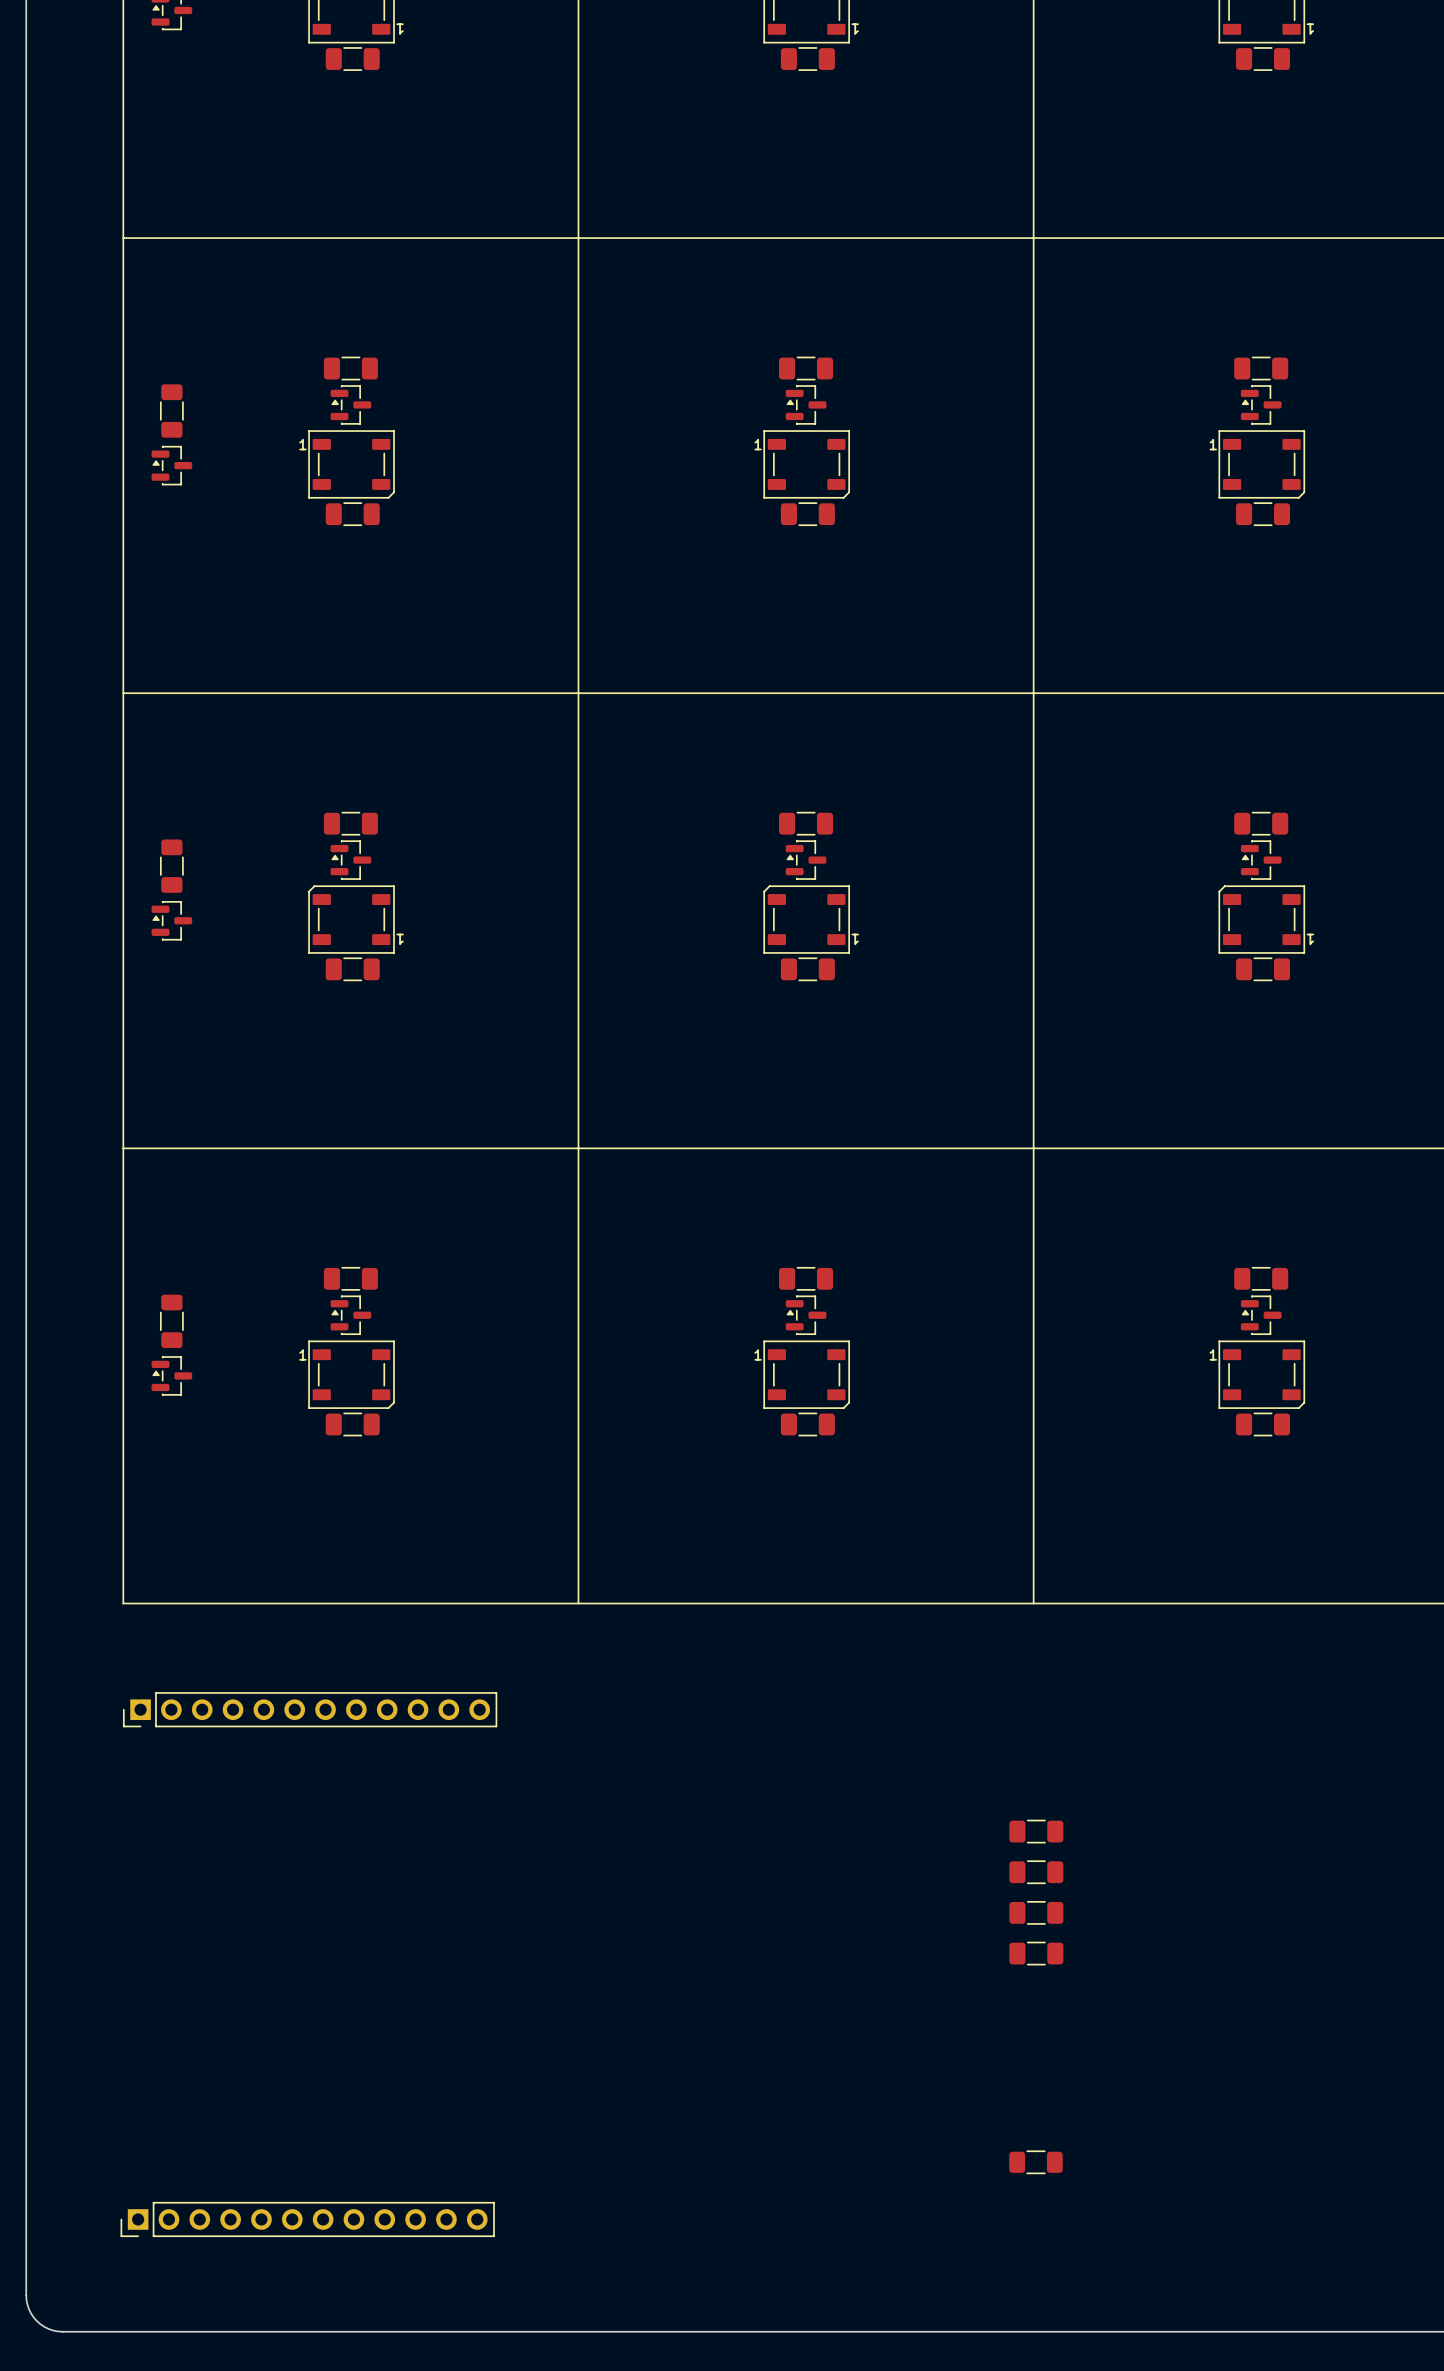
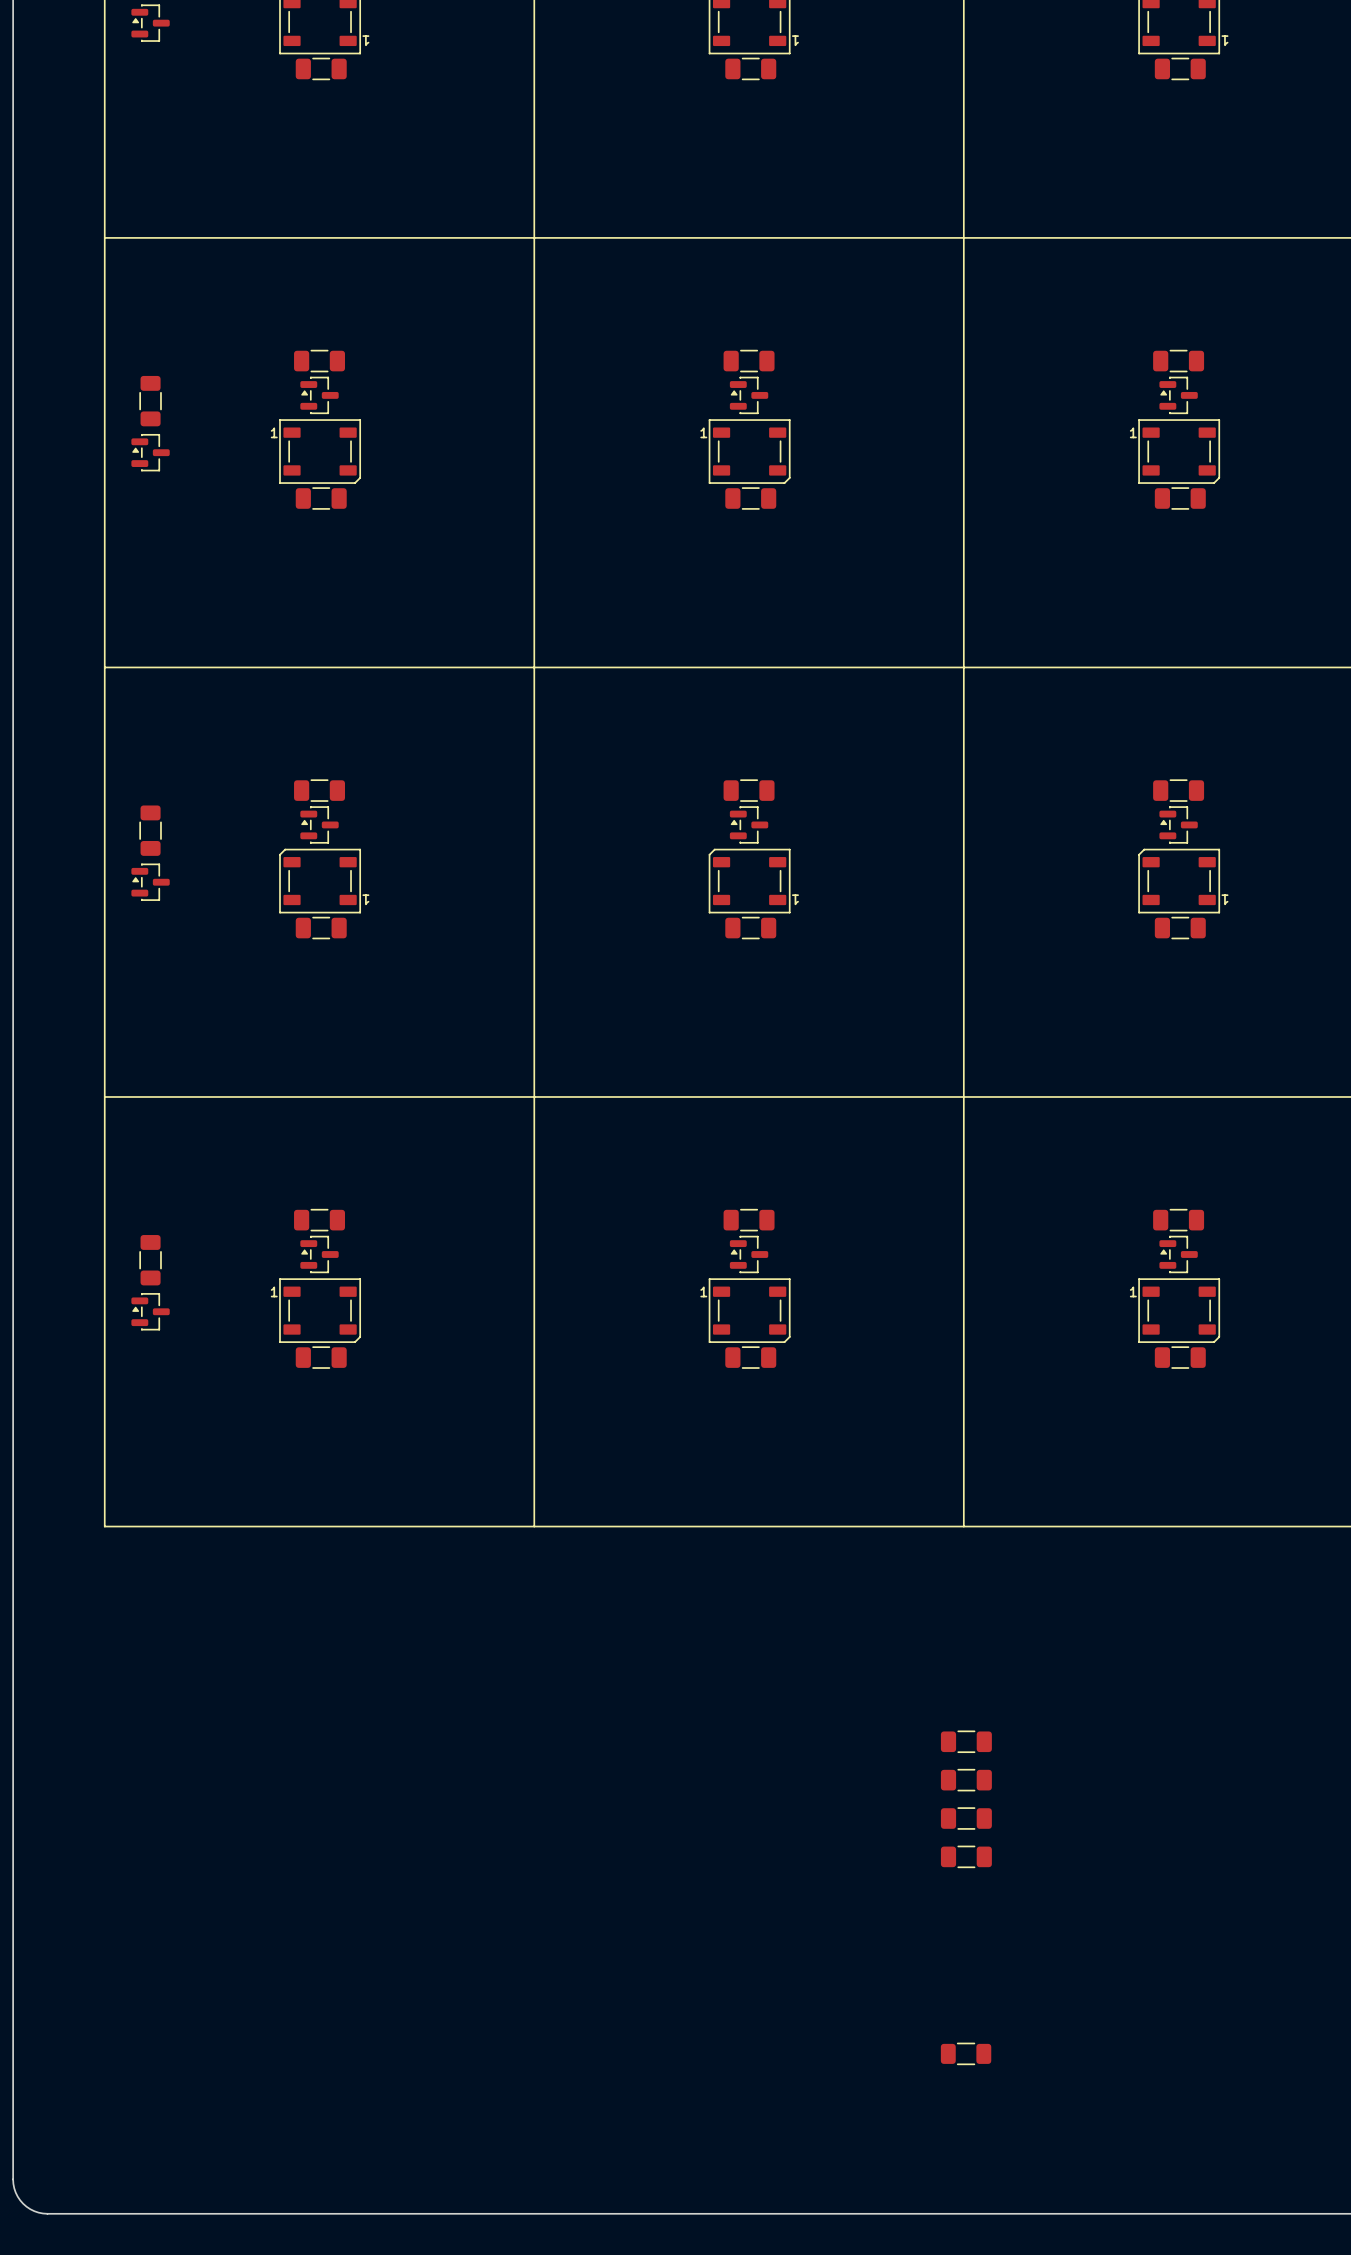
part: (310, 1709) -> none
part: (307, 2219) -> none

